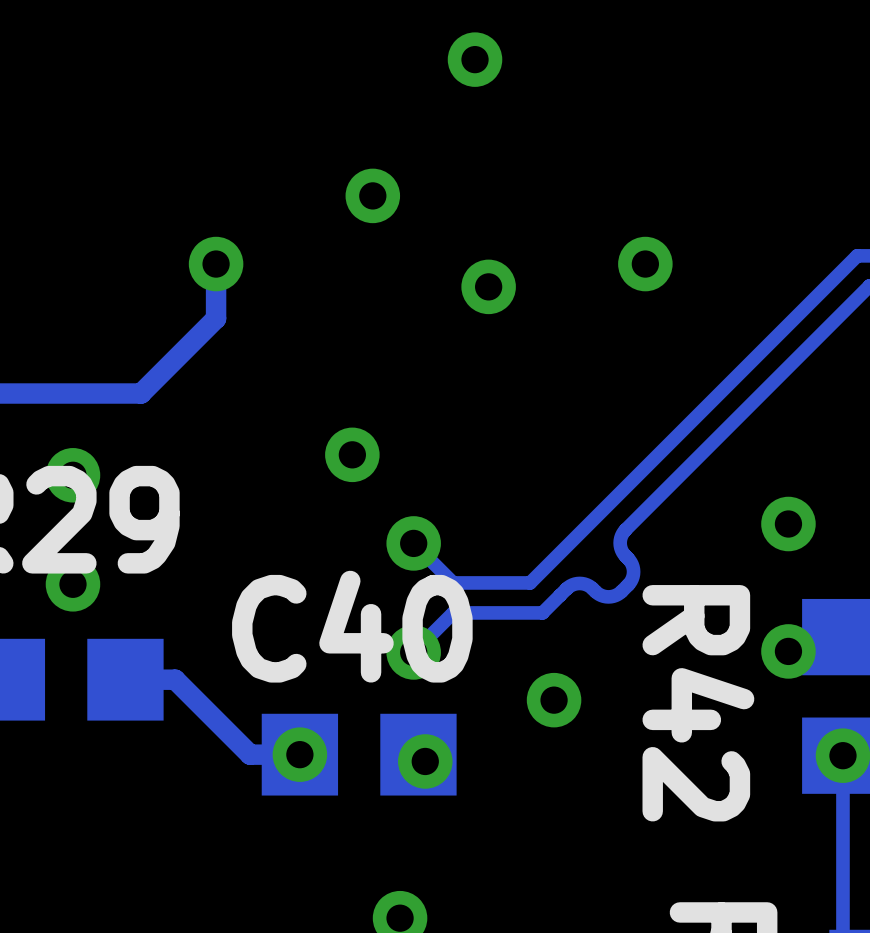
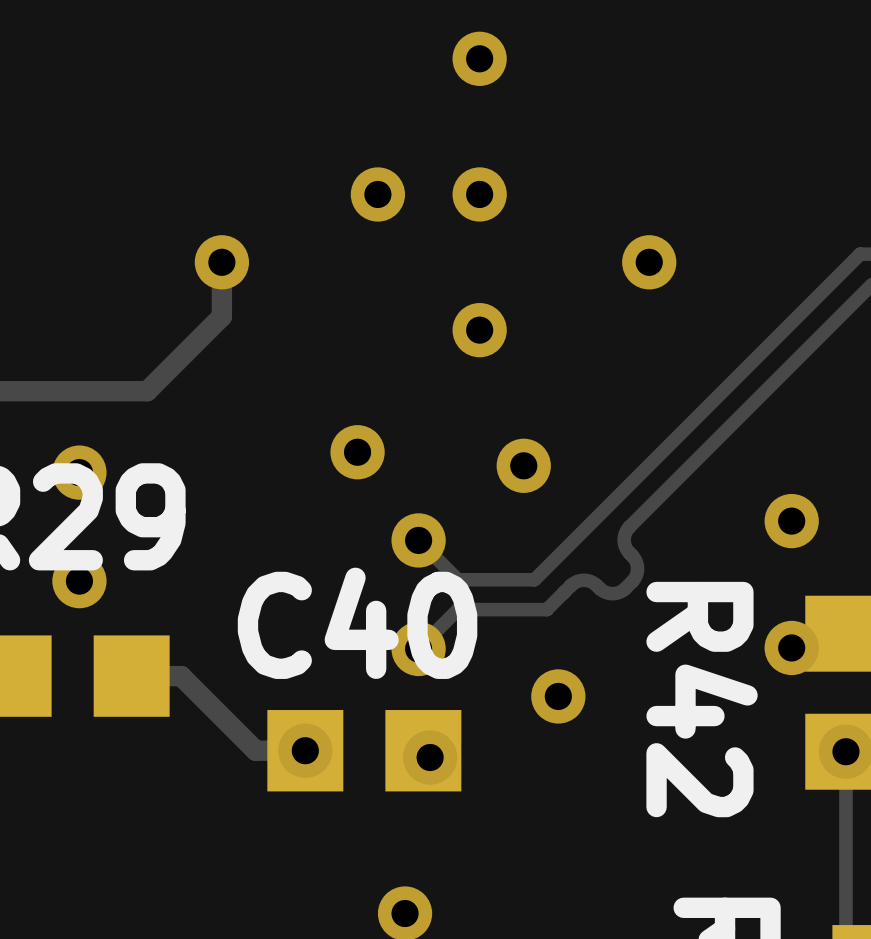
via: none -> (479, 194)
via position: (488, 286) -> (479, 330)
via: none -> (523, 465)

